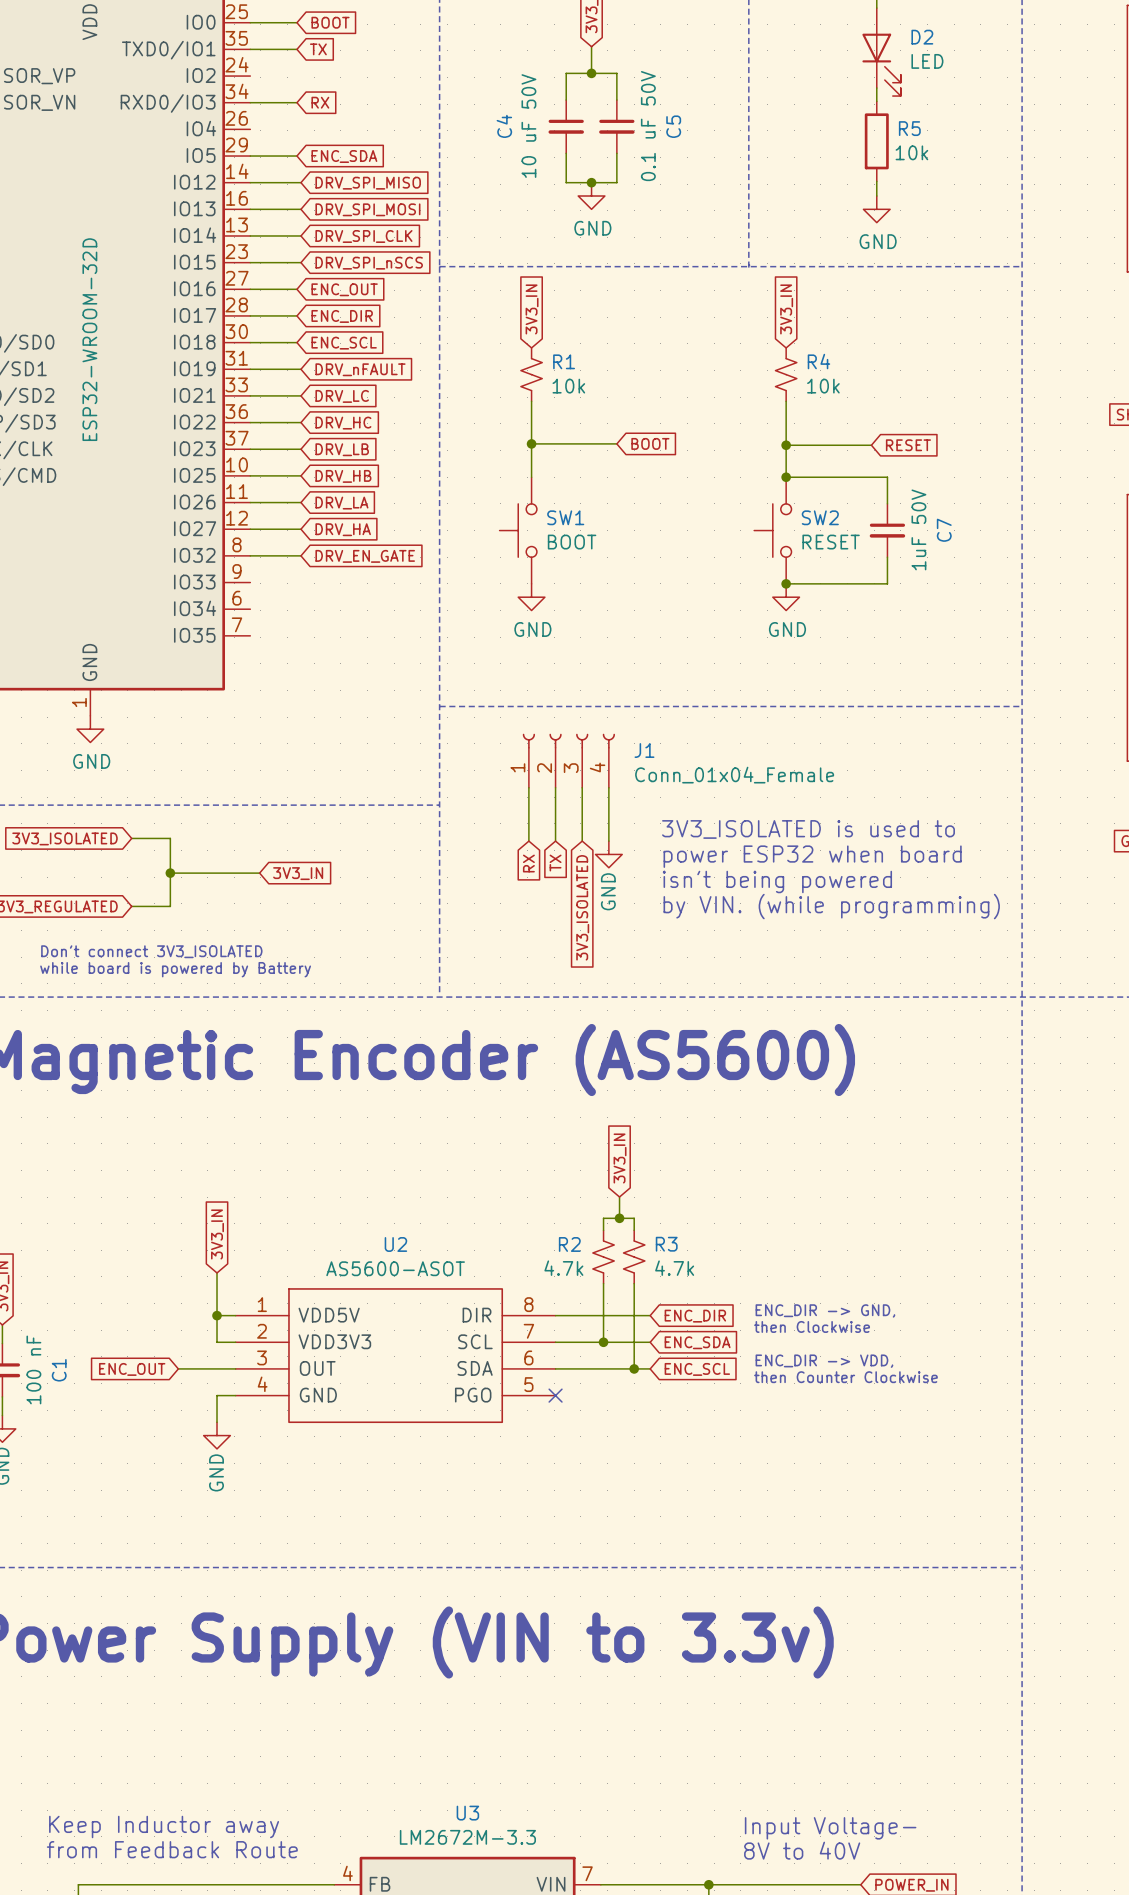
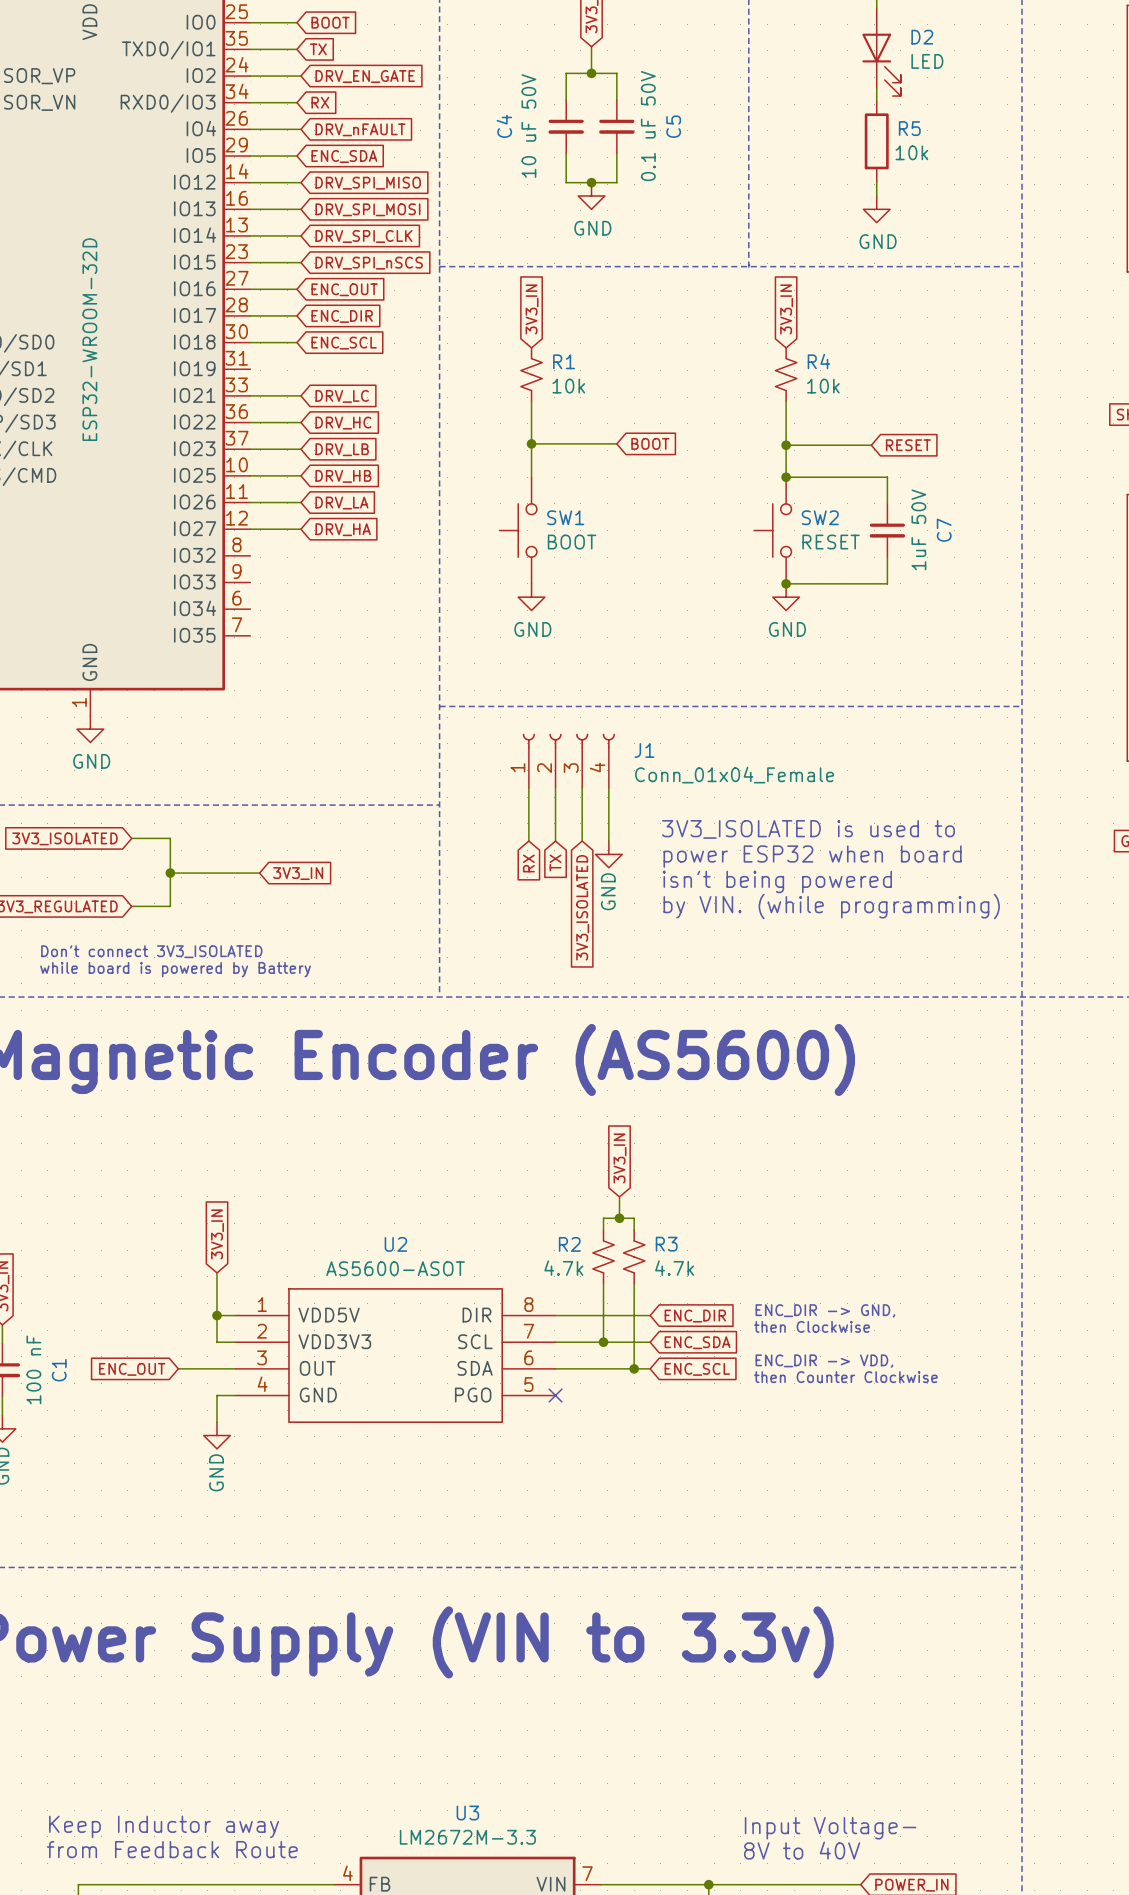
wire: none -> (250, 76) (300, 76)
global label: none -> DRV_EN_GATE (365, 76)
wire: (250, 369) (300, 369) -> (250, 129) (300, 129)
global label position: DRV_nFAULT (360, 369) -> DRV_nFAULT (360, 129)
wire: (250, 555) (300, 555) -> none
global label: DRV_EN_GATE (365, 556) -> none

